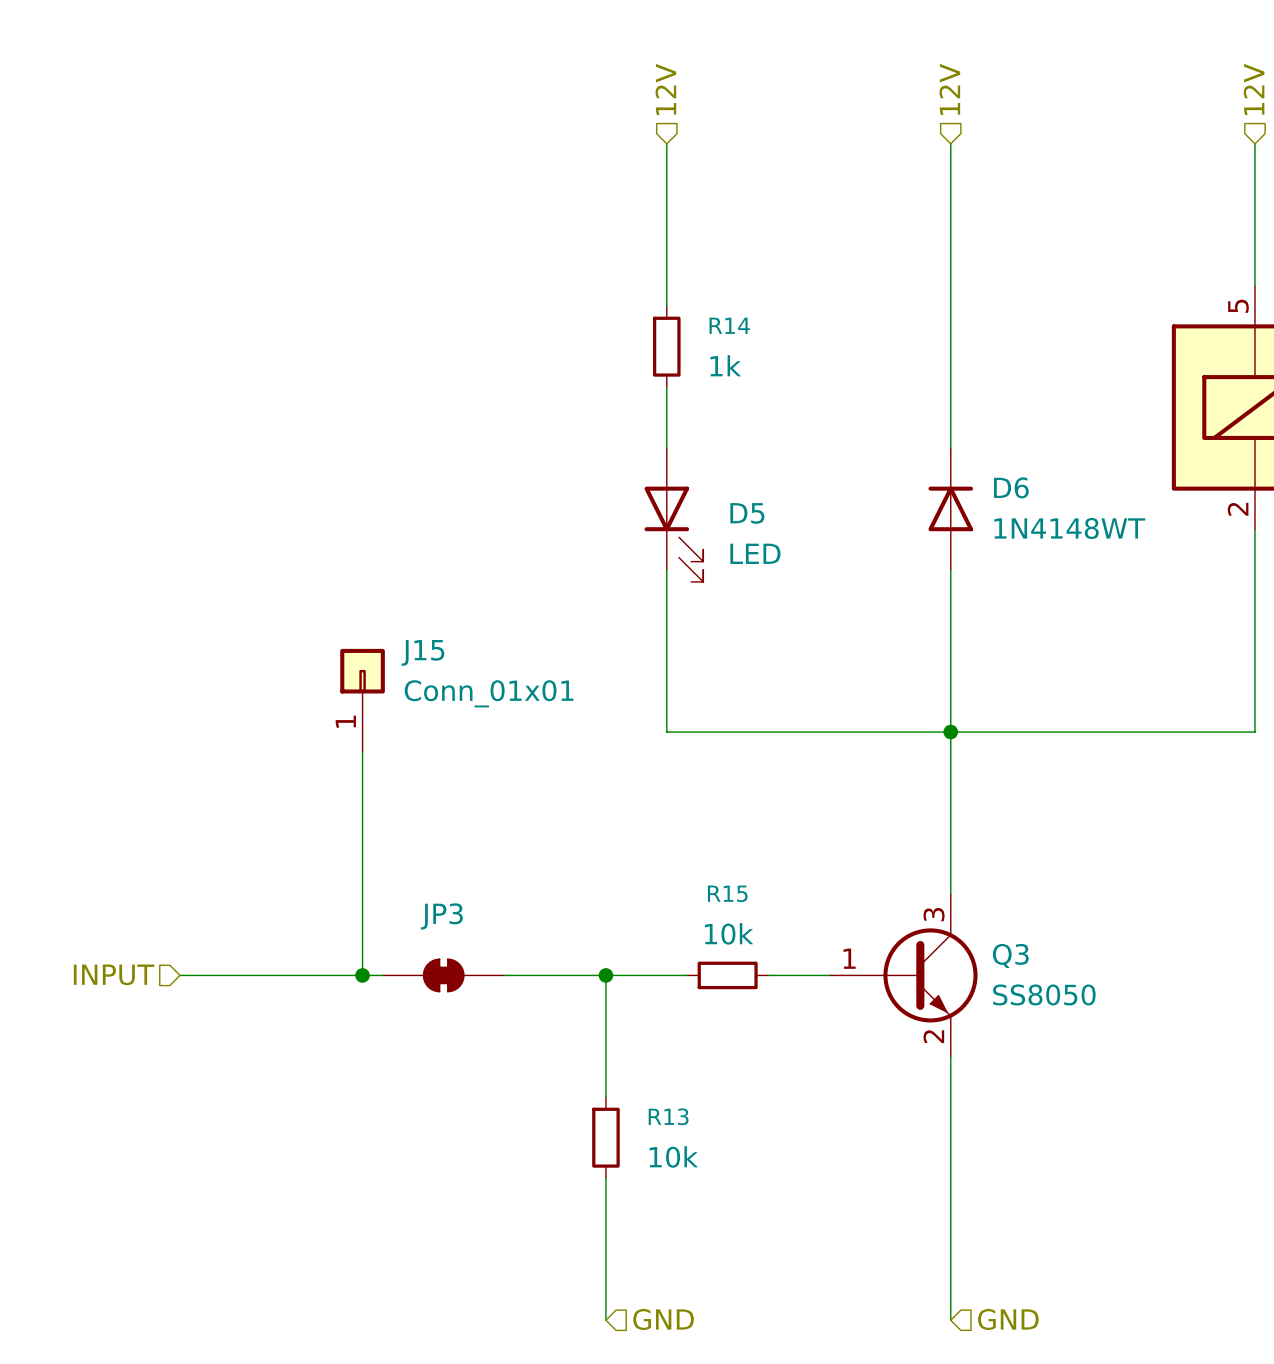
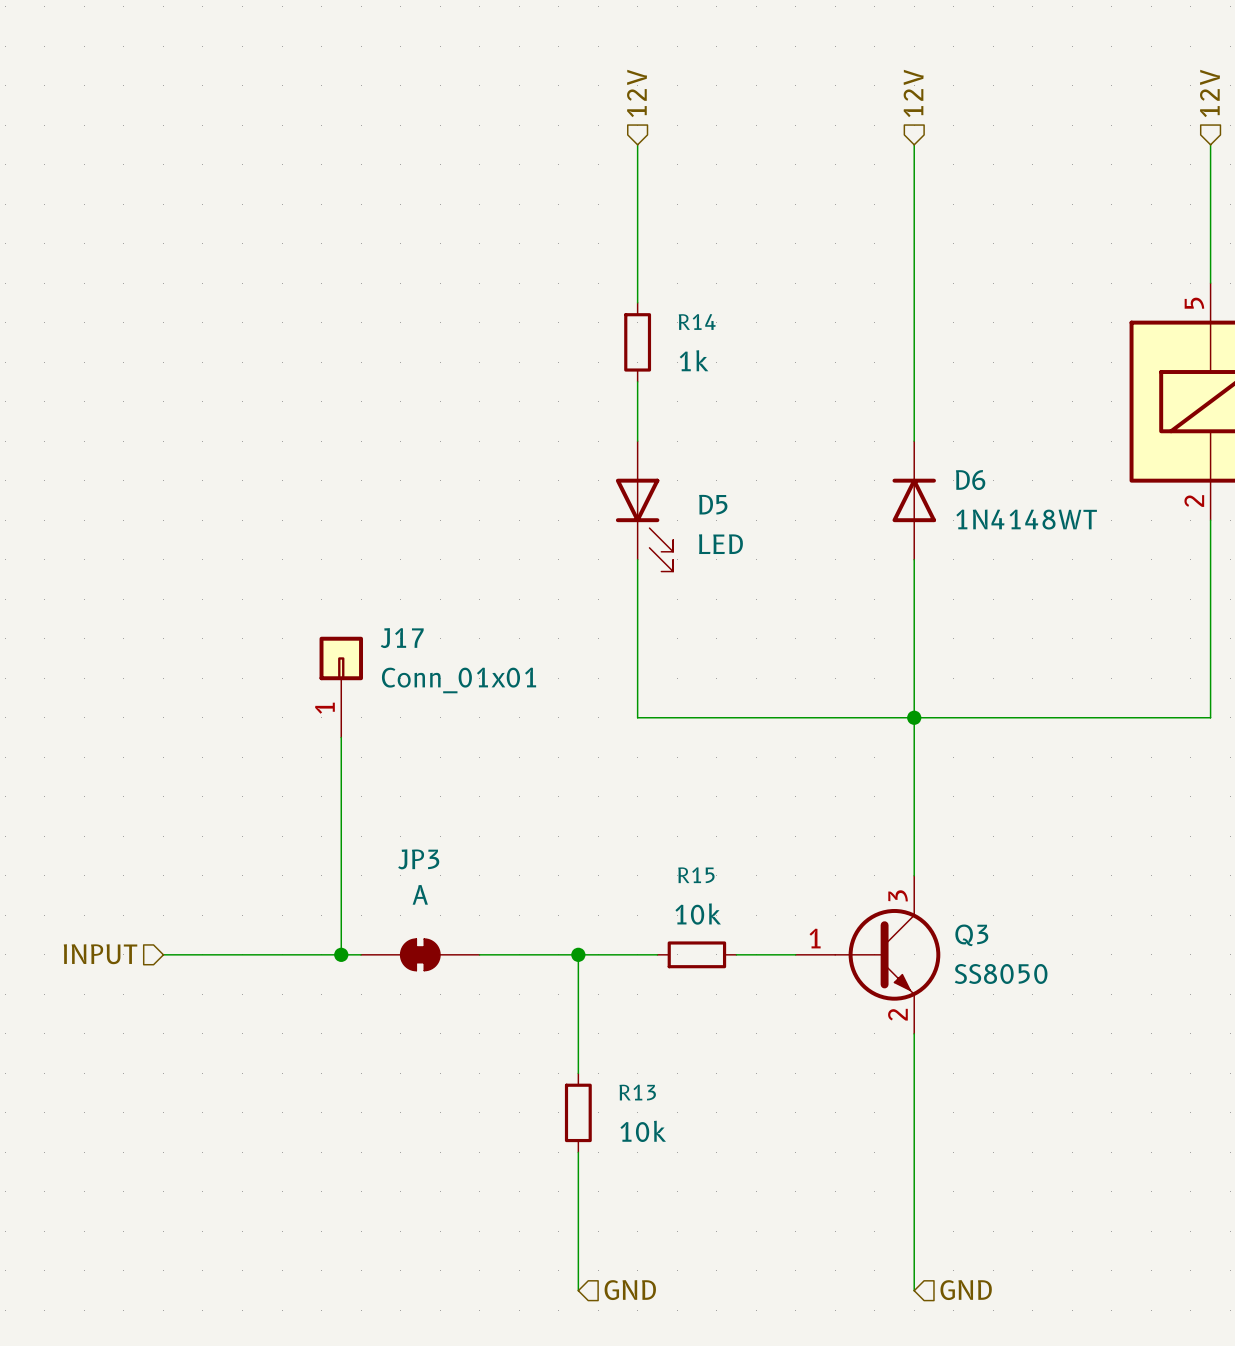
J15 name: J15 (422, 652) -> J17 (402, 638)
JP3 value: none -> A (420, 894)
JP3 name position: JP3 (441, 916) -> JP3 (418, 859)

